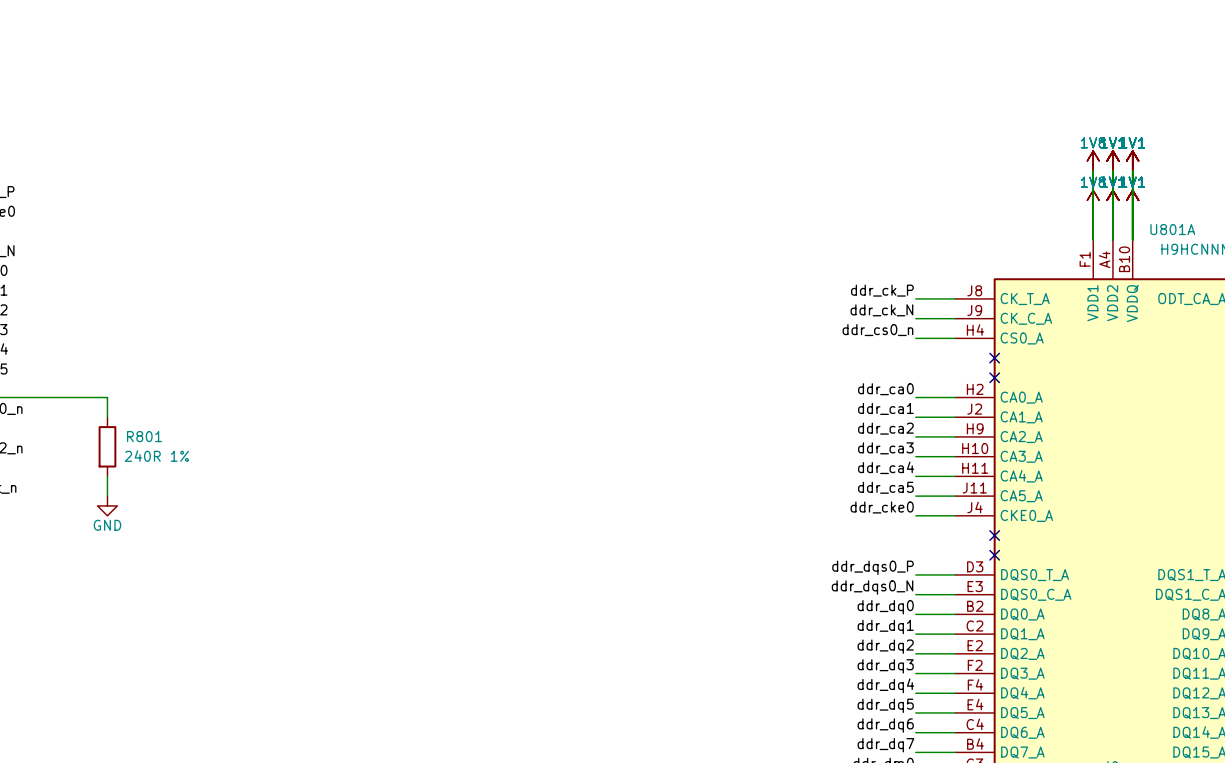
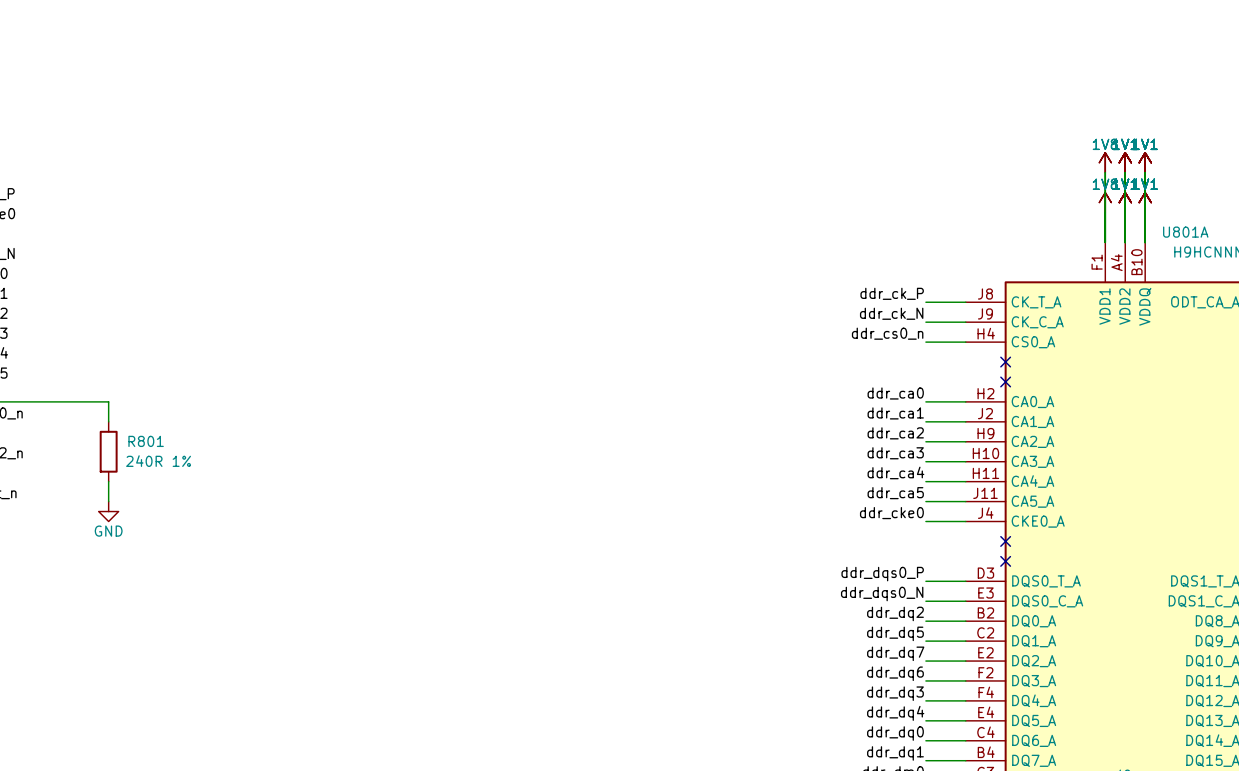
label: ddr_dq0 (885, 607) -> ddr_dq2 (895, 613)
label: ddr_dq1 (885, 626) -> ddr_dq5 (895, 633)
label: ddr_dq2 (885, 646) -> ddr_dq7 (895, 653)
label: ddr_dq3 (885, 666) -> ddr_dq6 (895, 673)
label: ddr_dq4 (885, 685) -> ddr_dq3 (895, 693)
label: ddr_dq5 (885, 705) -> ddr_dq4 (895, 713)
label: ddr_dq6 (885, 725) -> ddr_dq0 (895, 733)
label: ddr_dq7 (885, 745) -> ddr_dq1 (895, 753)

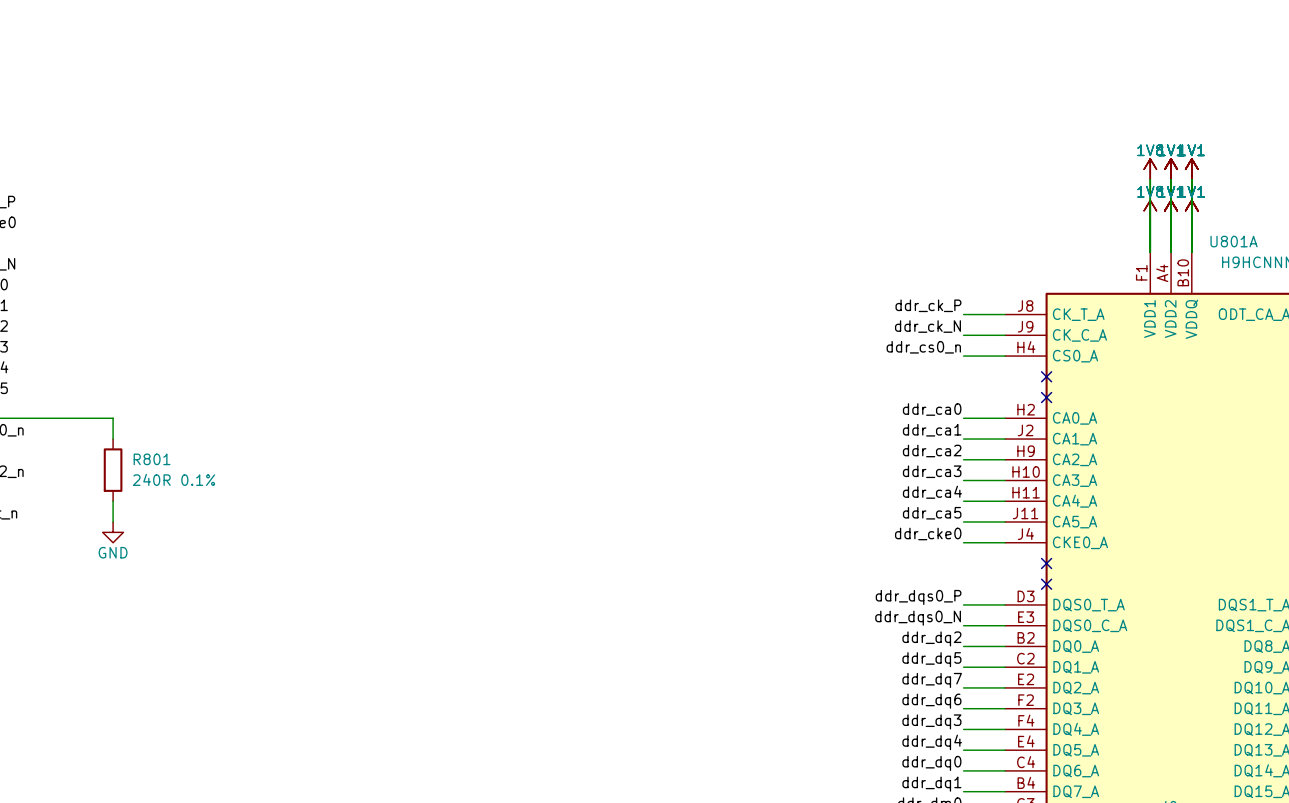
R801 value: 240R 1% (158, 461) -> 240R 0.1% (174, 479)

